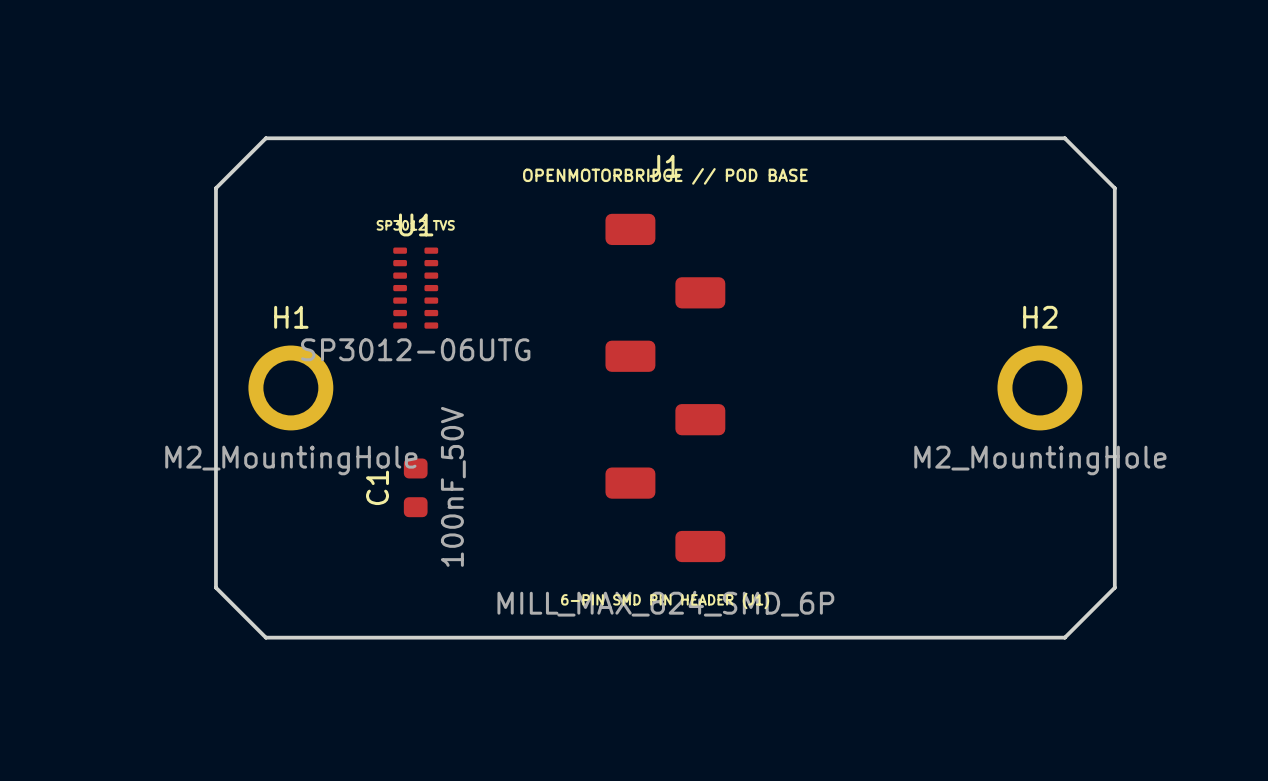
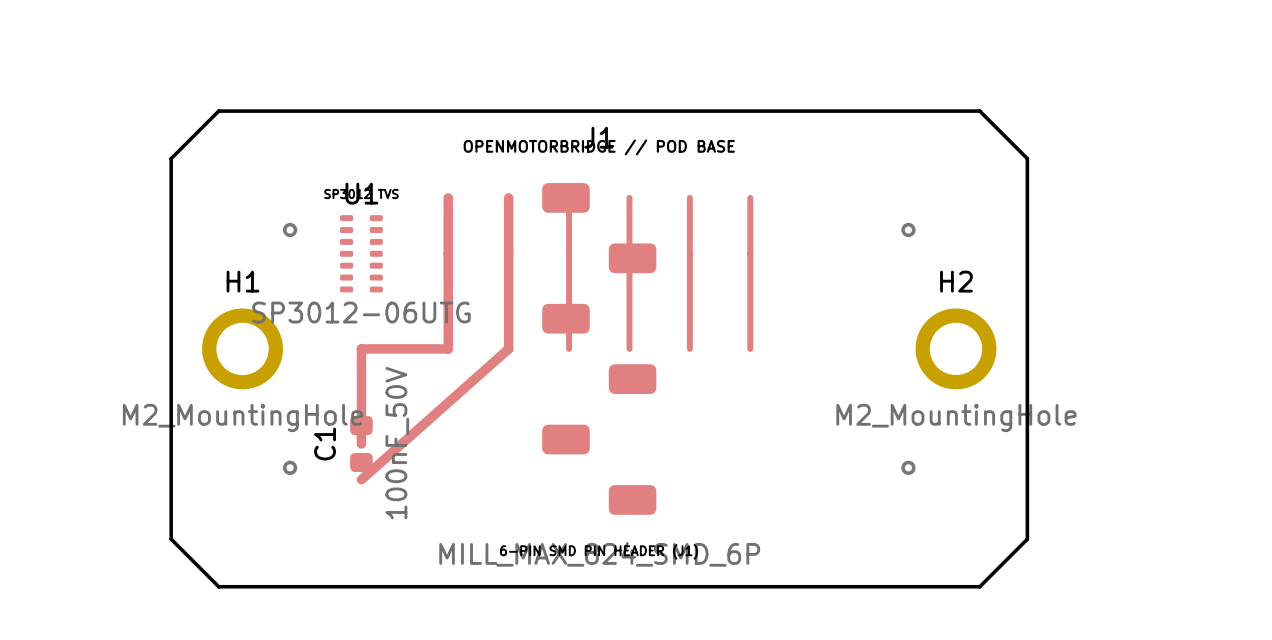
track: none -> (448, 197) (448, 348) (361, 348) (361, 444)
track: none -> (508, 197) (508, 348) (361, 479)
track: none -> (569, 197) (569, 348)
track: none -> (629, 197) (629, 348)
track: none -> (689, 197) (689, 348)
track: none -> (750, 197) (750, 348)
via: none -> (290, 230)
via: none -> (908, 230)
via: none -> (290, 467)
via: none -> (908, 467)

